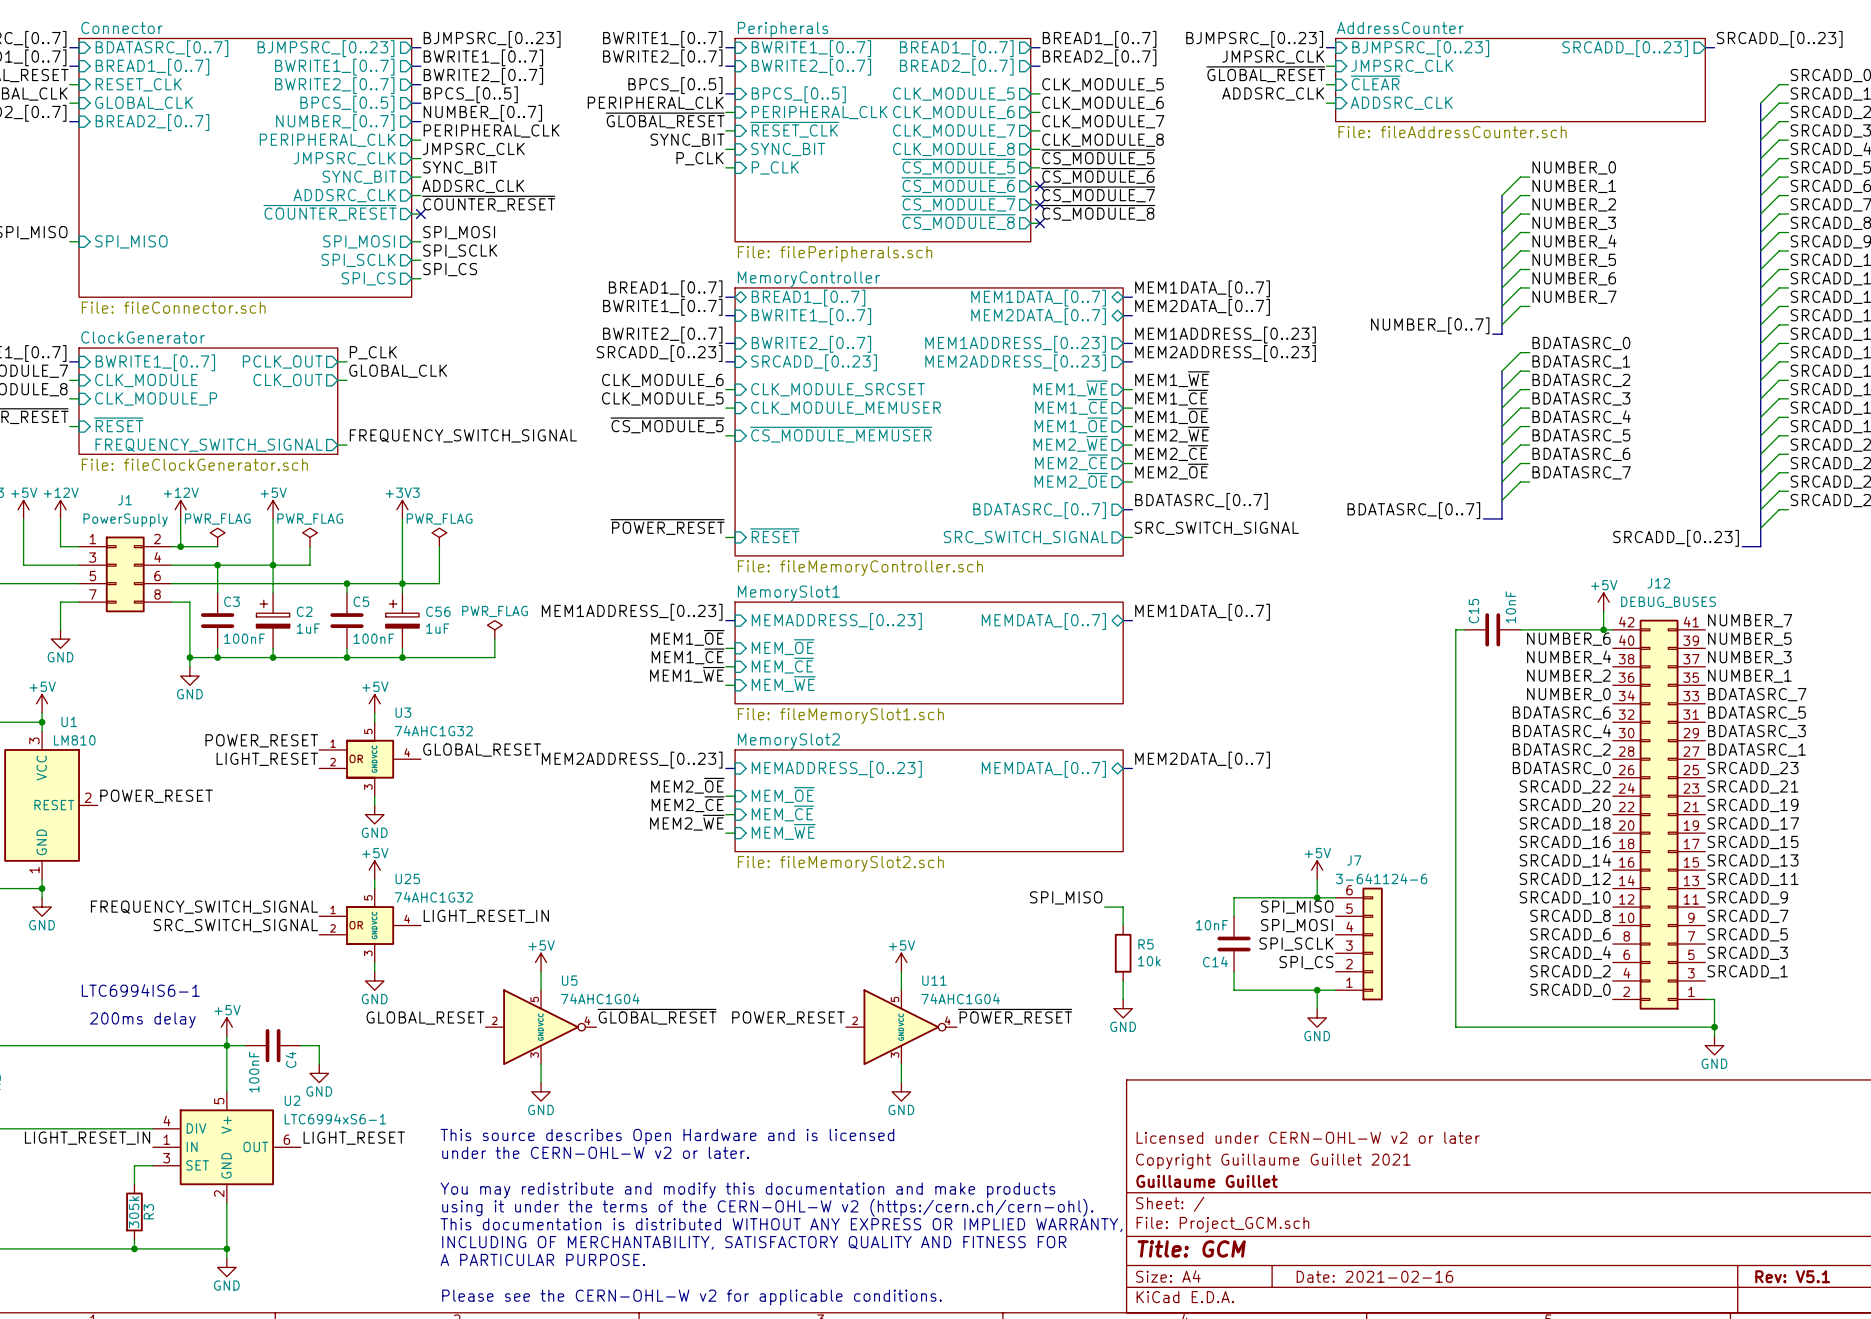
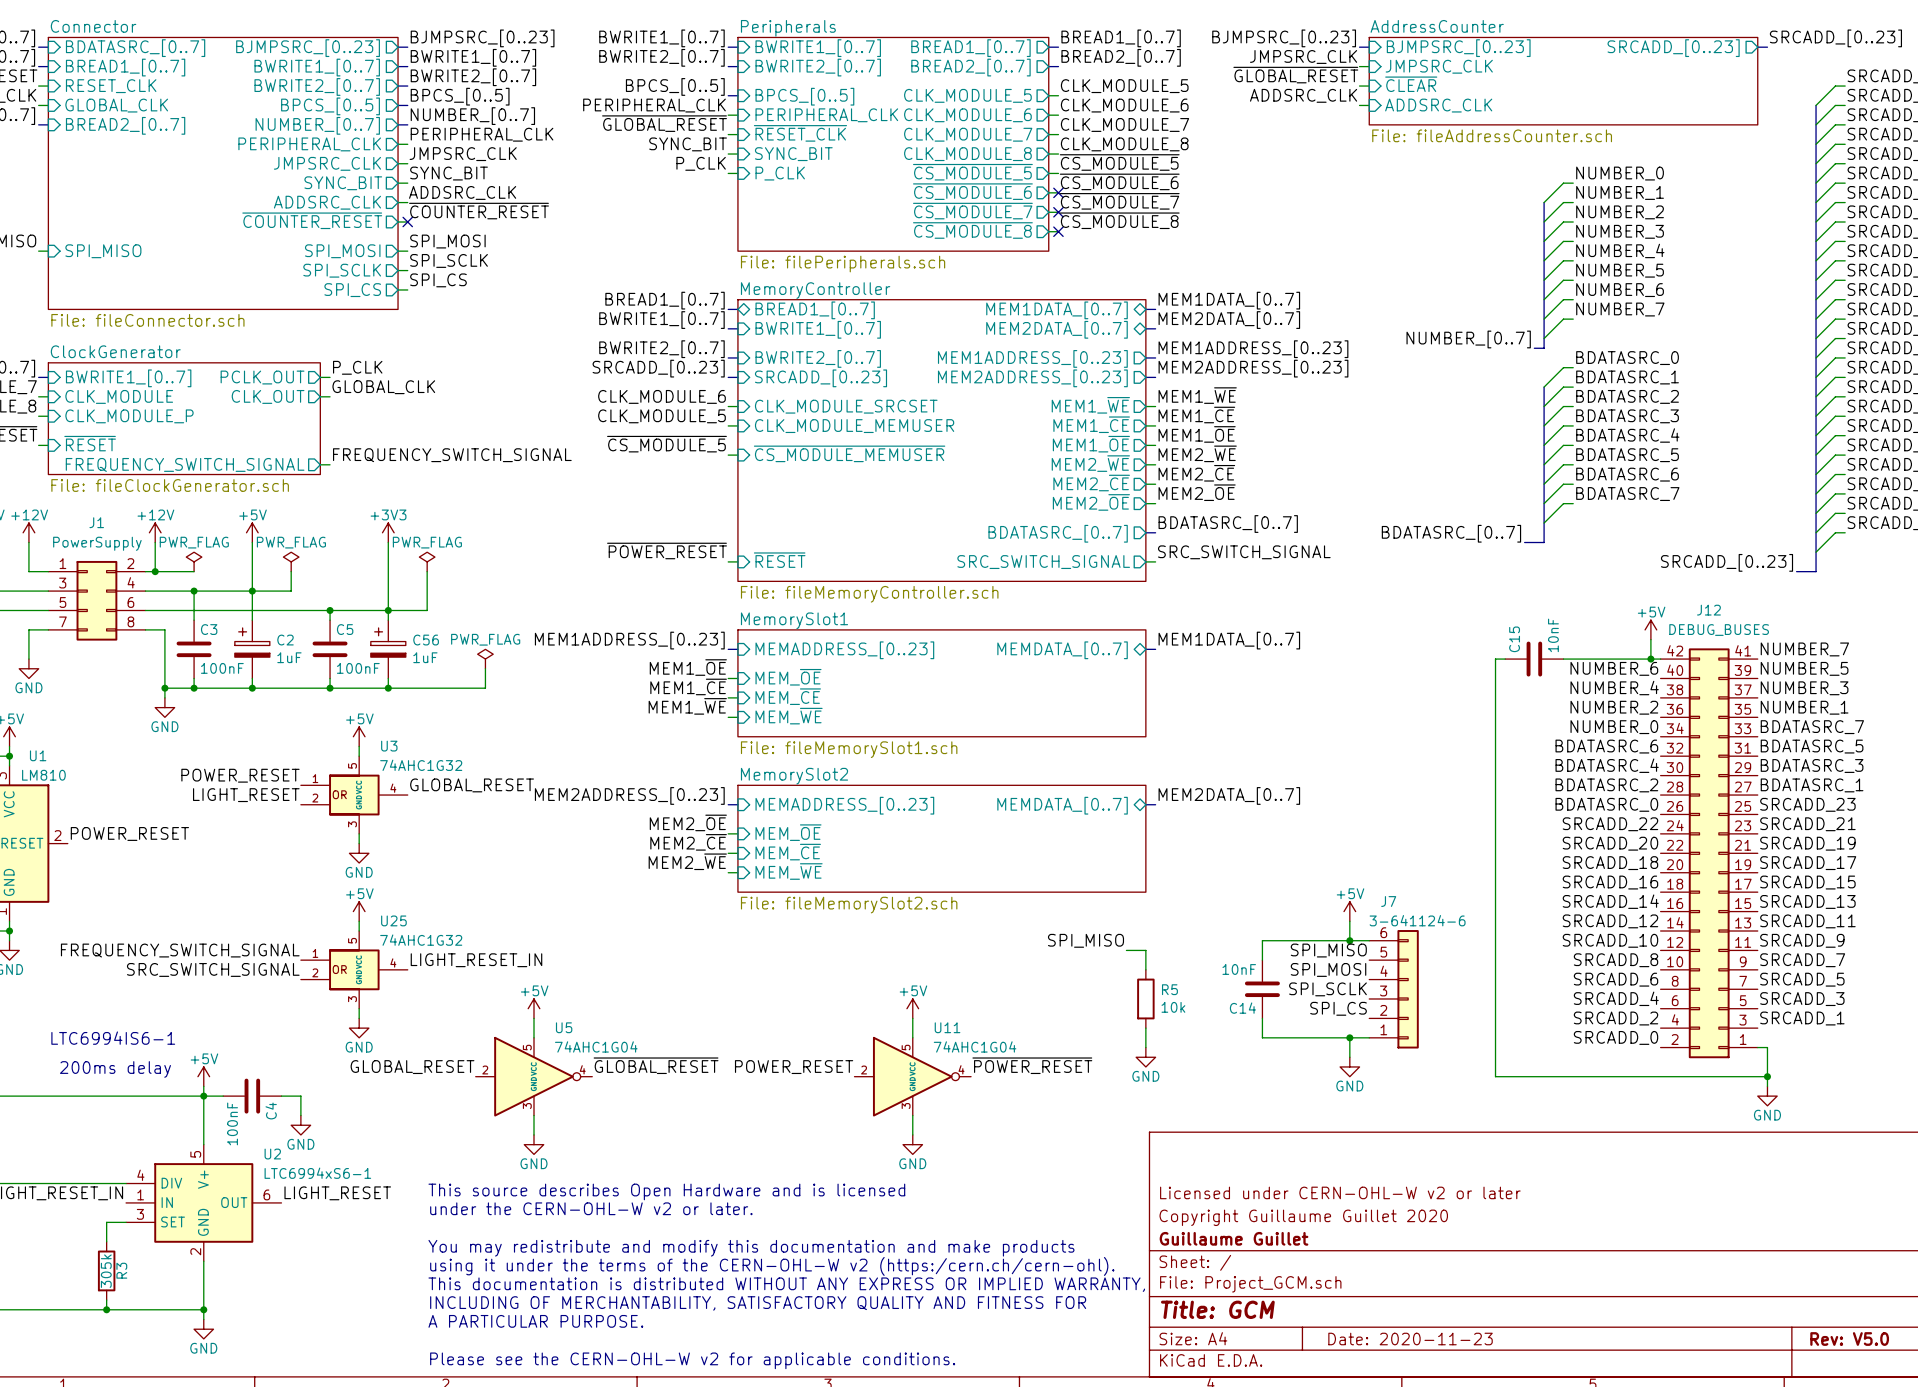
title block: Copyright Guillaume Guillet 2021 (1273, 1161) -> Copyright Guillaume Guillet 2020 (1303, 1217)
title block: Date: 2021-02-16 (1374, 1276) -> Date: 2020-11-23 (1410, 1339)
title block: Rev: V5.1 (1792, 1276) -> Rev: V5.0 (1849, 1339)

